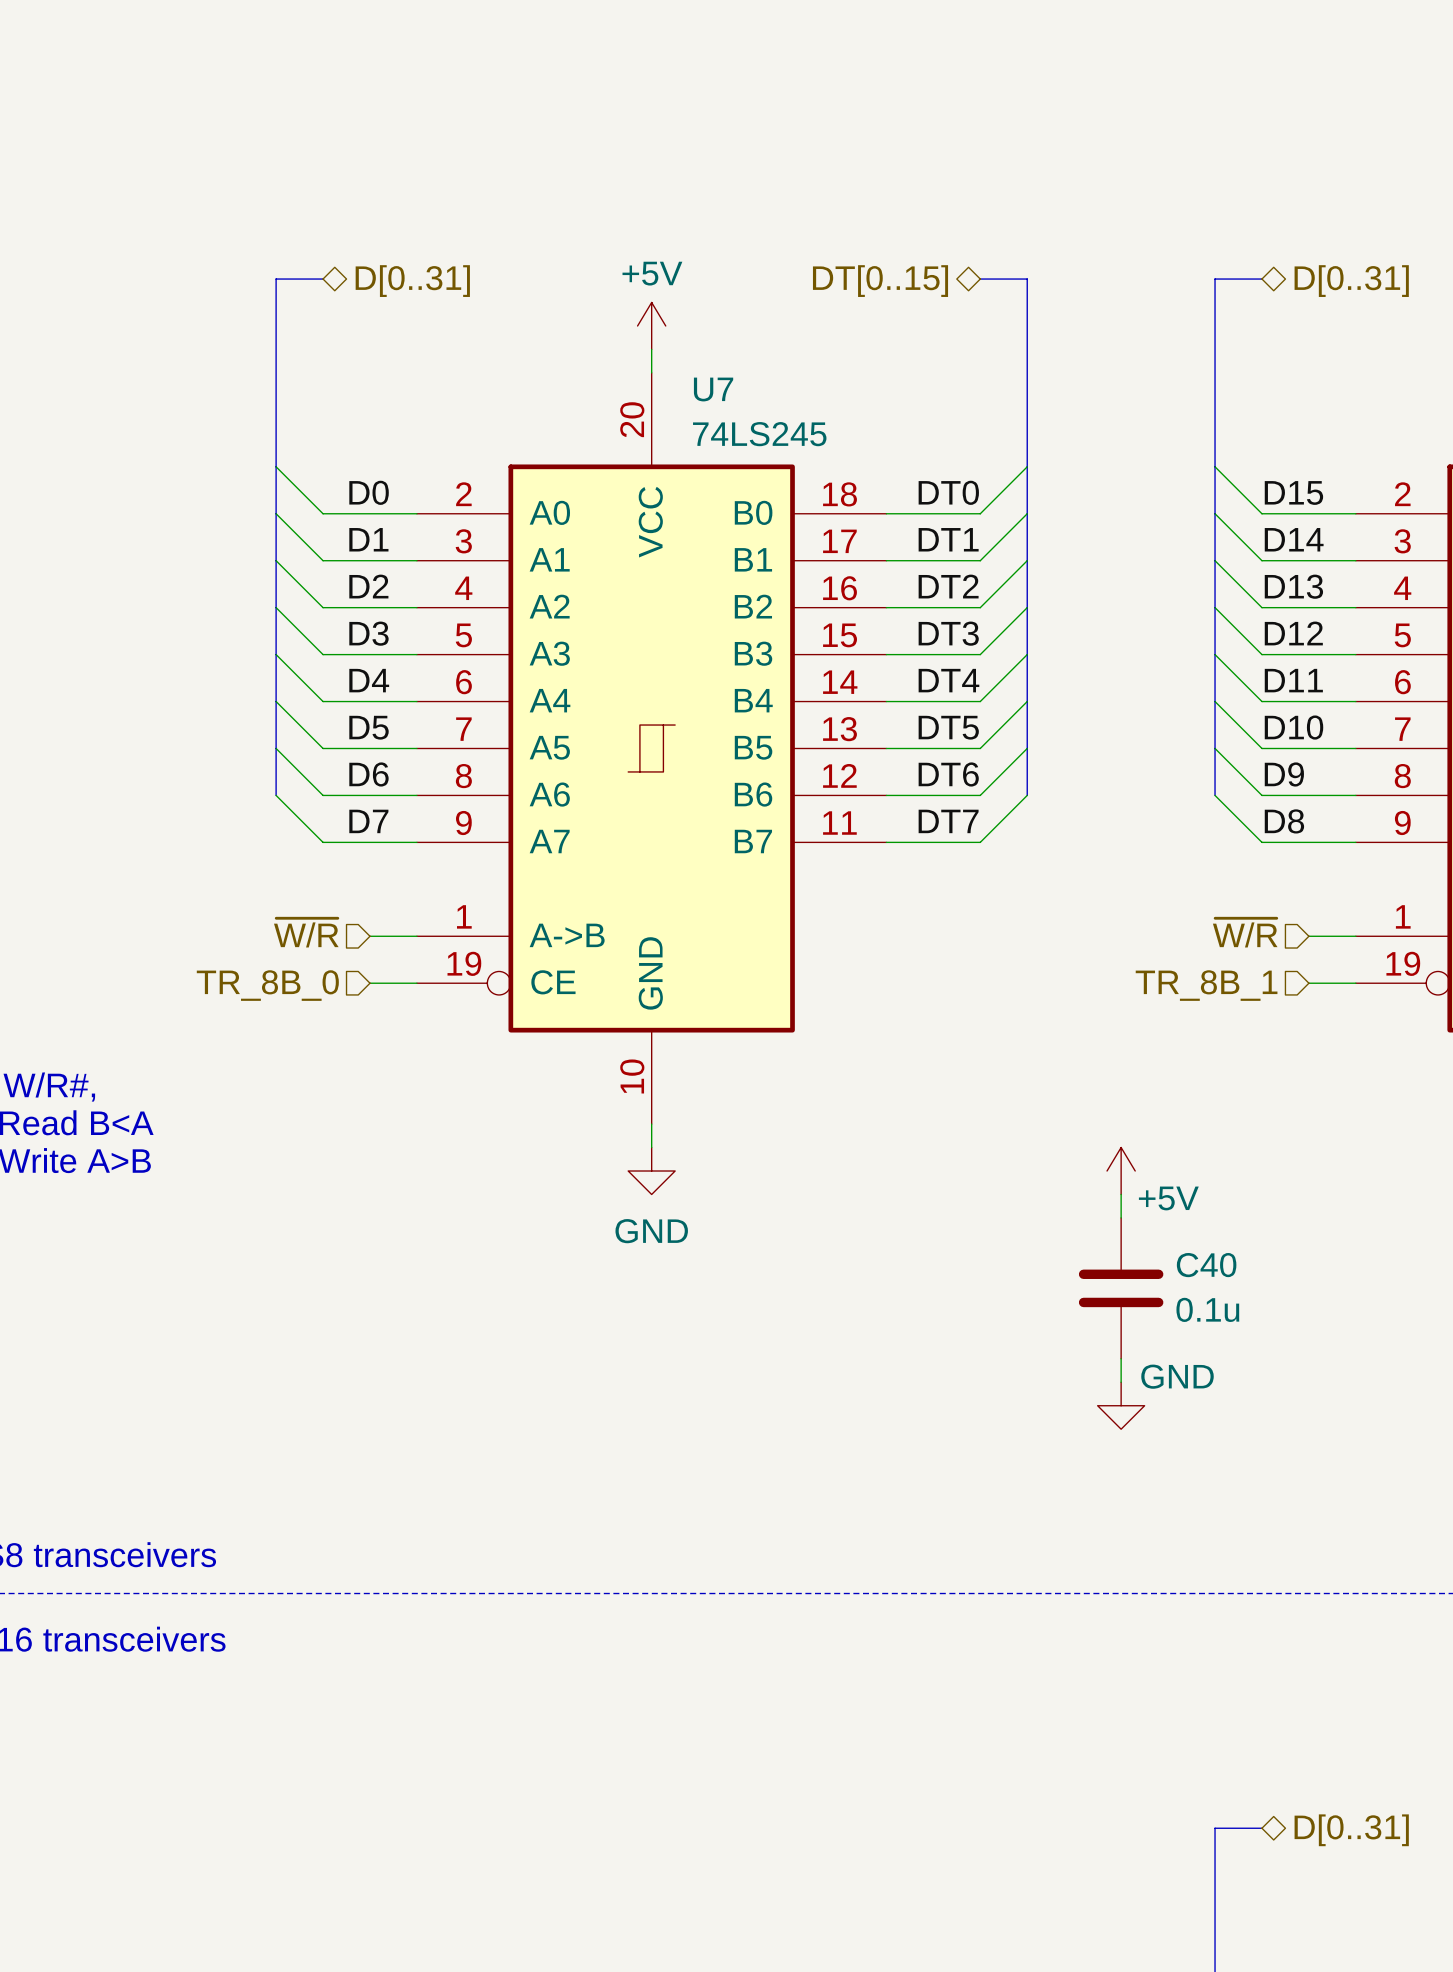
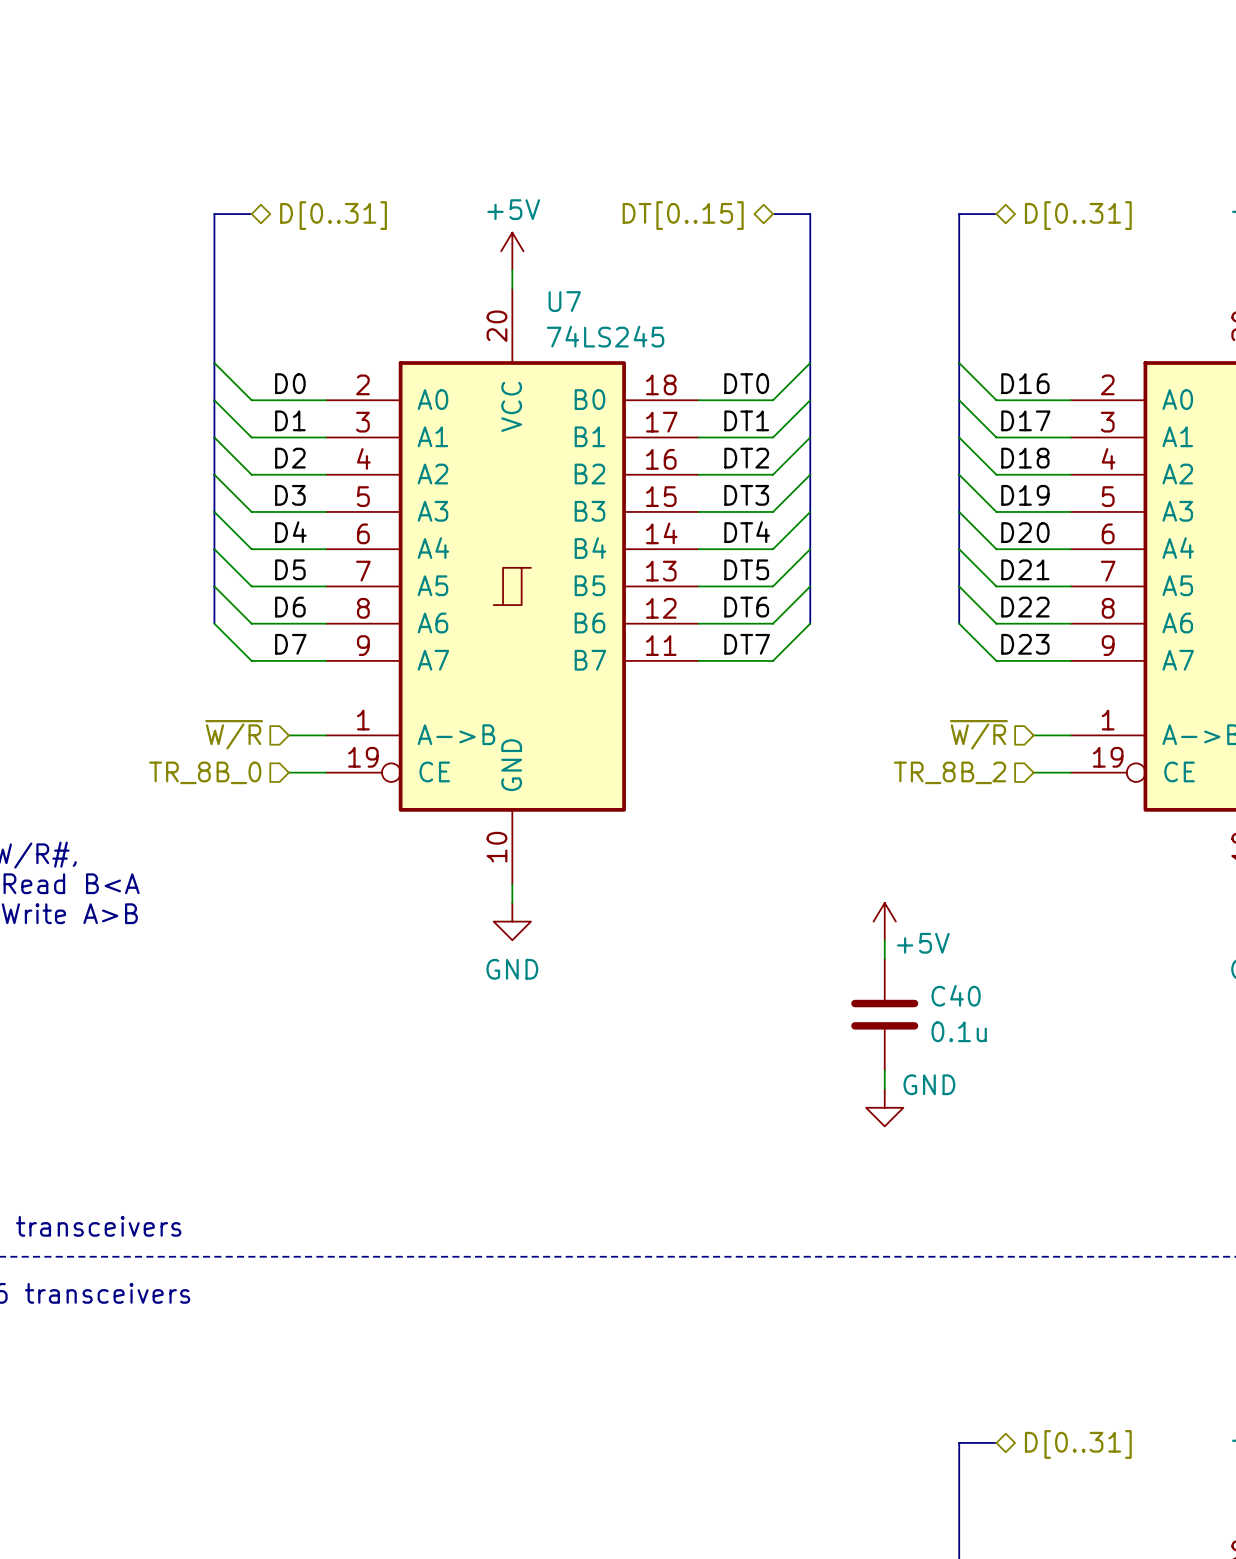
label: D15 (1293, 492) -> D16 (1025, 383)
label: D14 (1294, 539) -> D17 (1025, 420)
label: D13 (1293, 586) -> D18 (1025, 458)
label: D12 (1293, 633) -> D19 (1025, 495)
label: D11 (1293, 680) -> D20 (1025, 532)
label: D10 (1293, 727) -> D21 (1025, 569)
label: D9 (1284, 774) -> D22 (1025, 607)
label: D8 (1284, 821) -> D23 (1025, 644)
hierarchical label: TR_8B_1 (1206, 985) -> TR_8B_2 (950, 772)

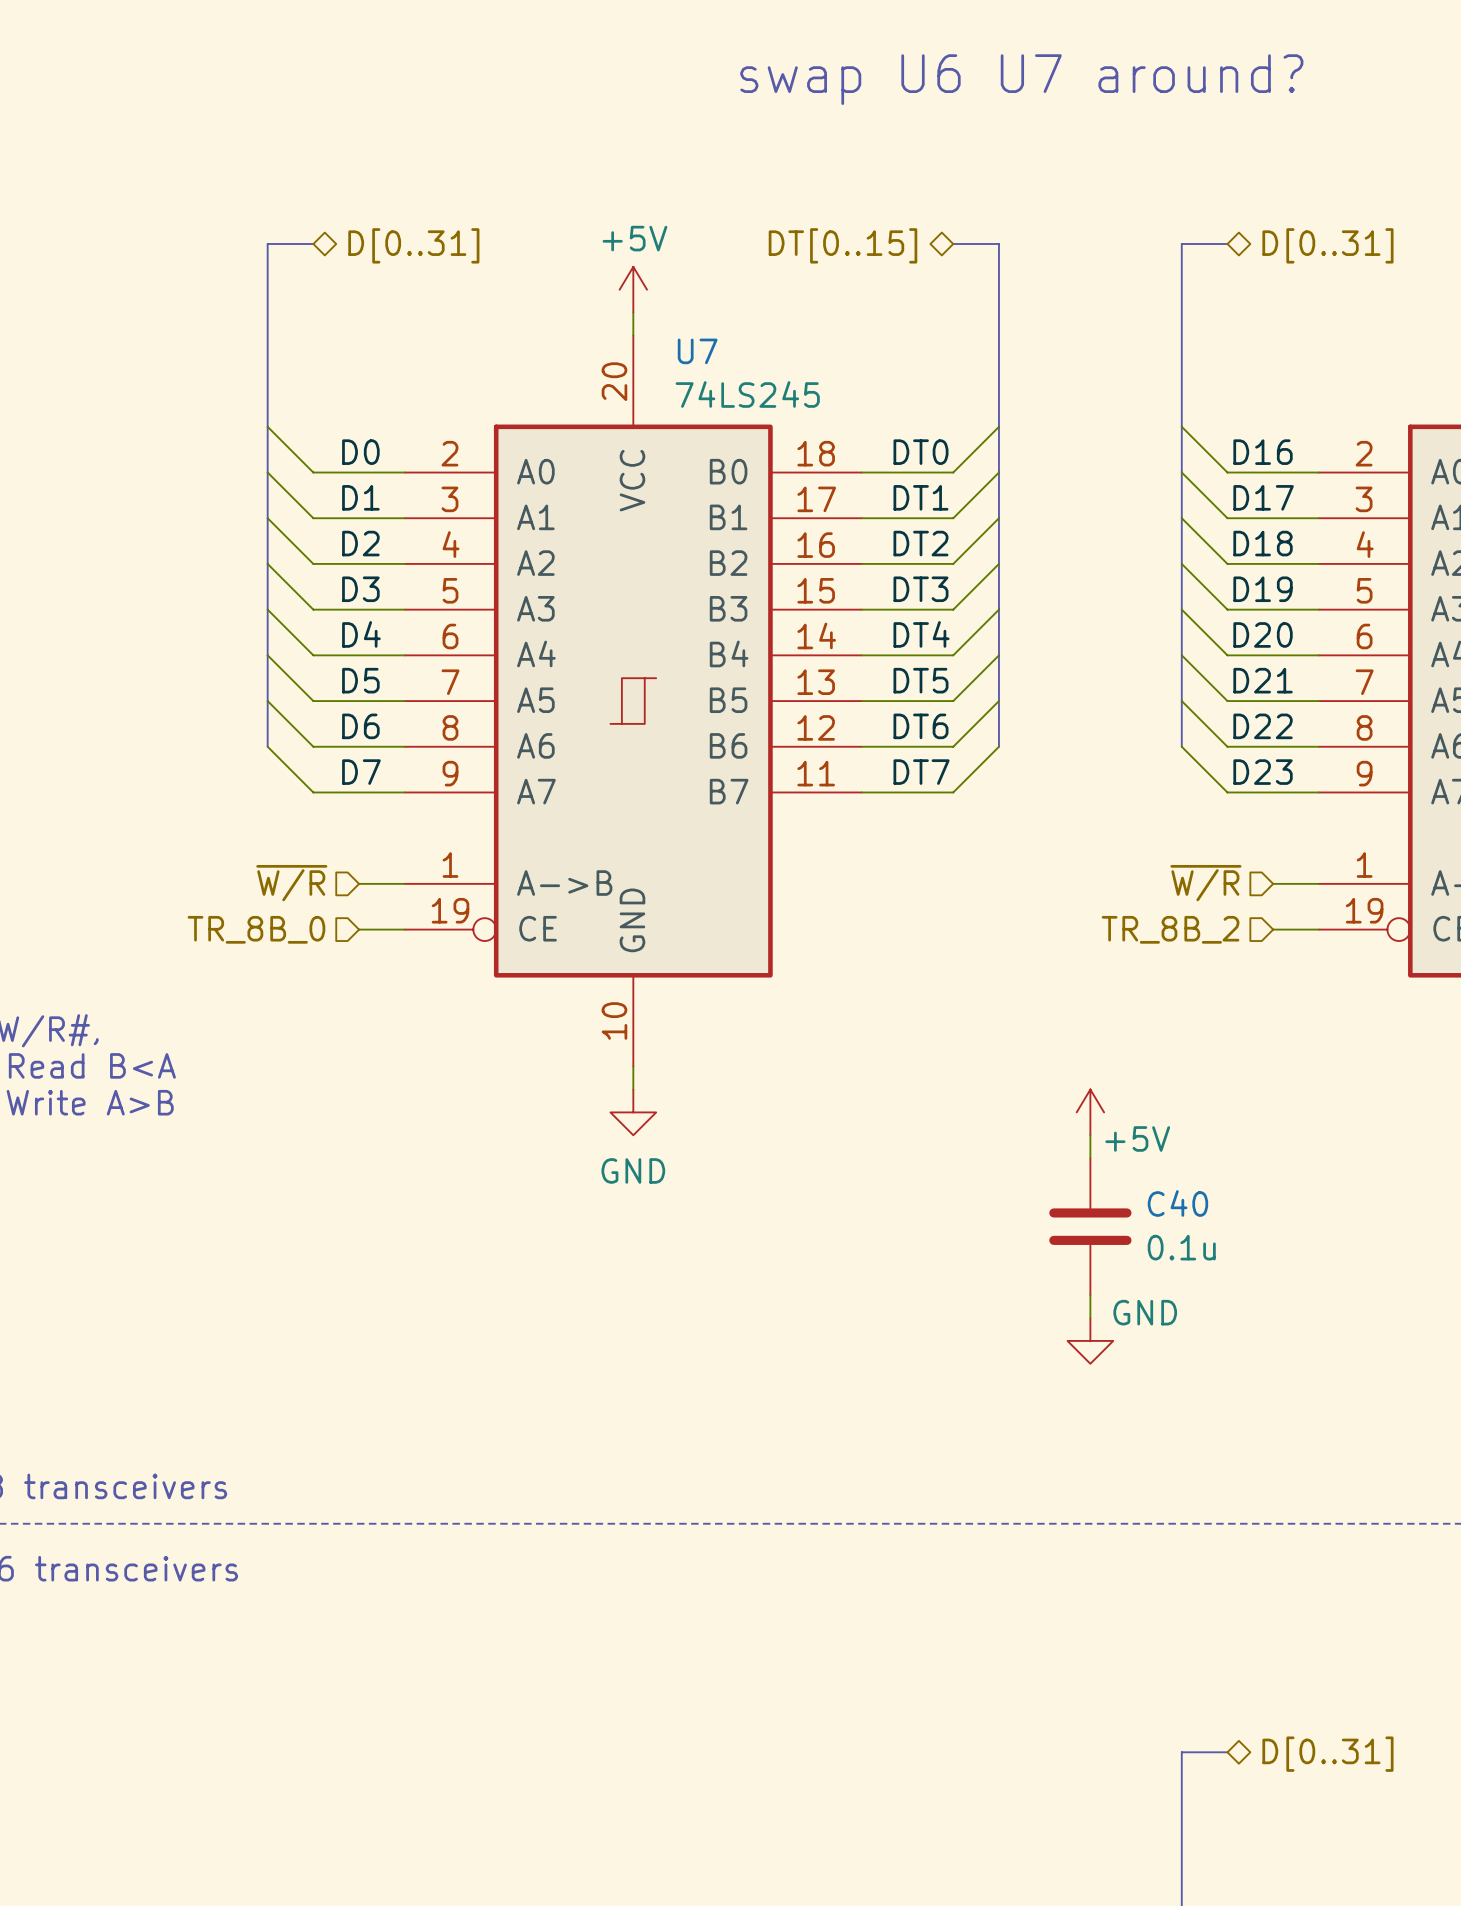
text: none -> swap U6 U7 around? (1021, 79)

